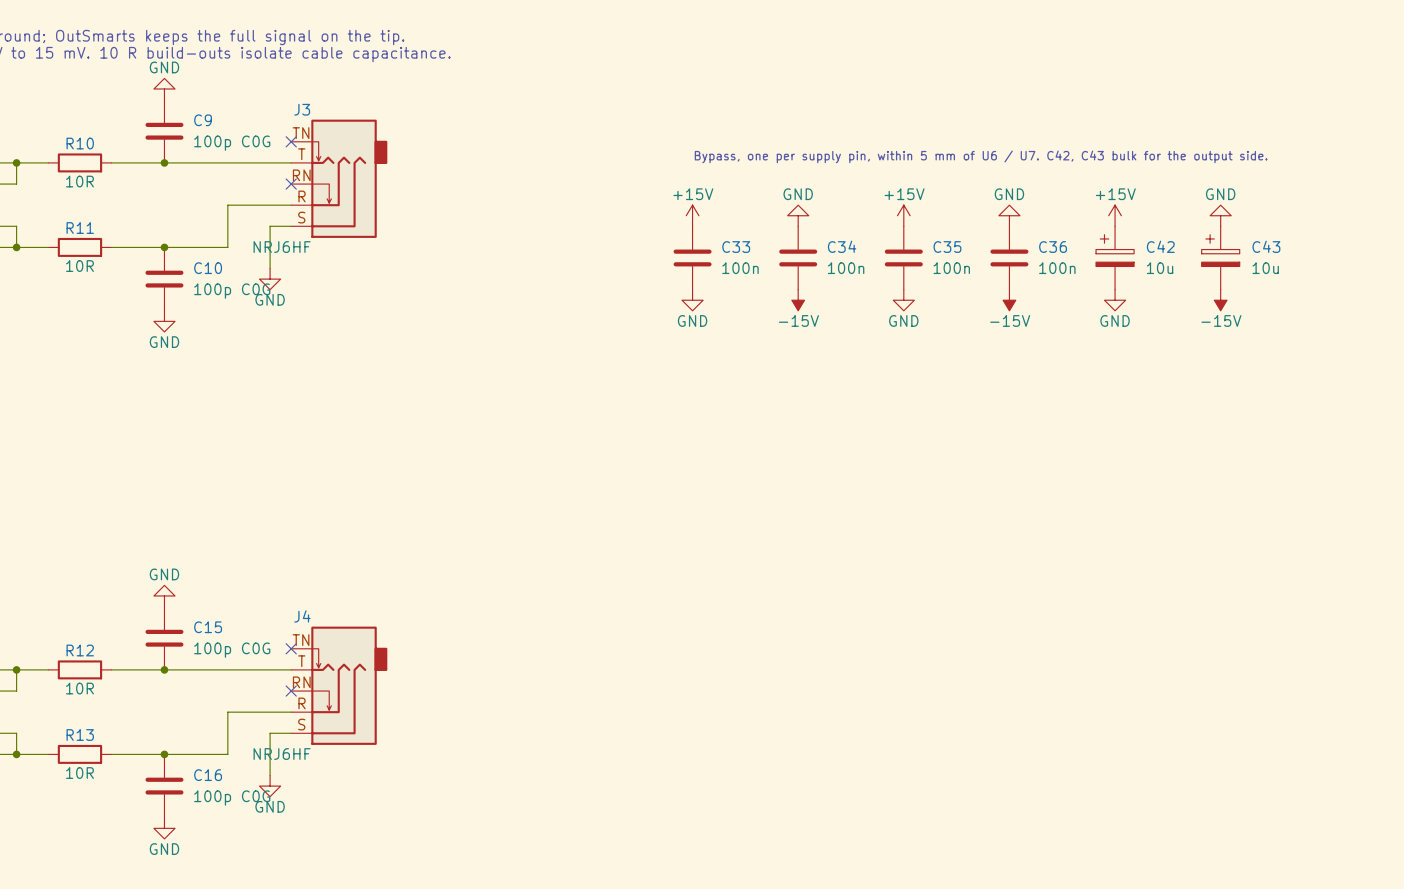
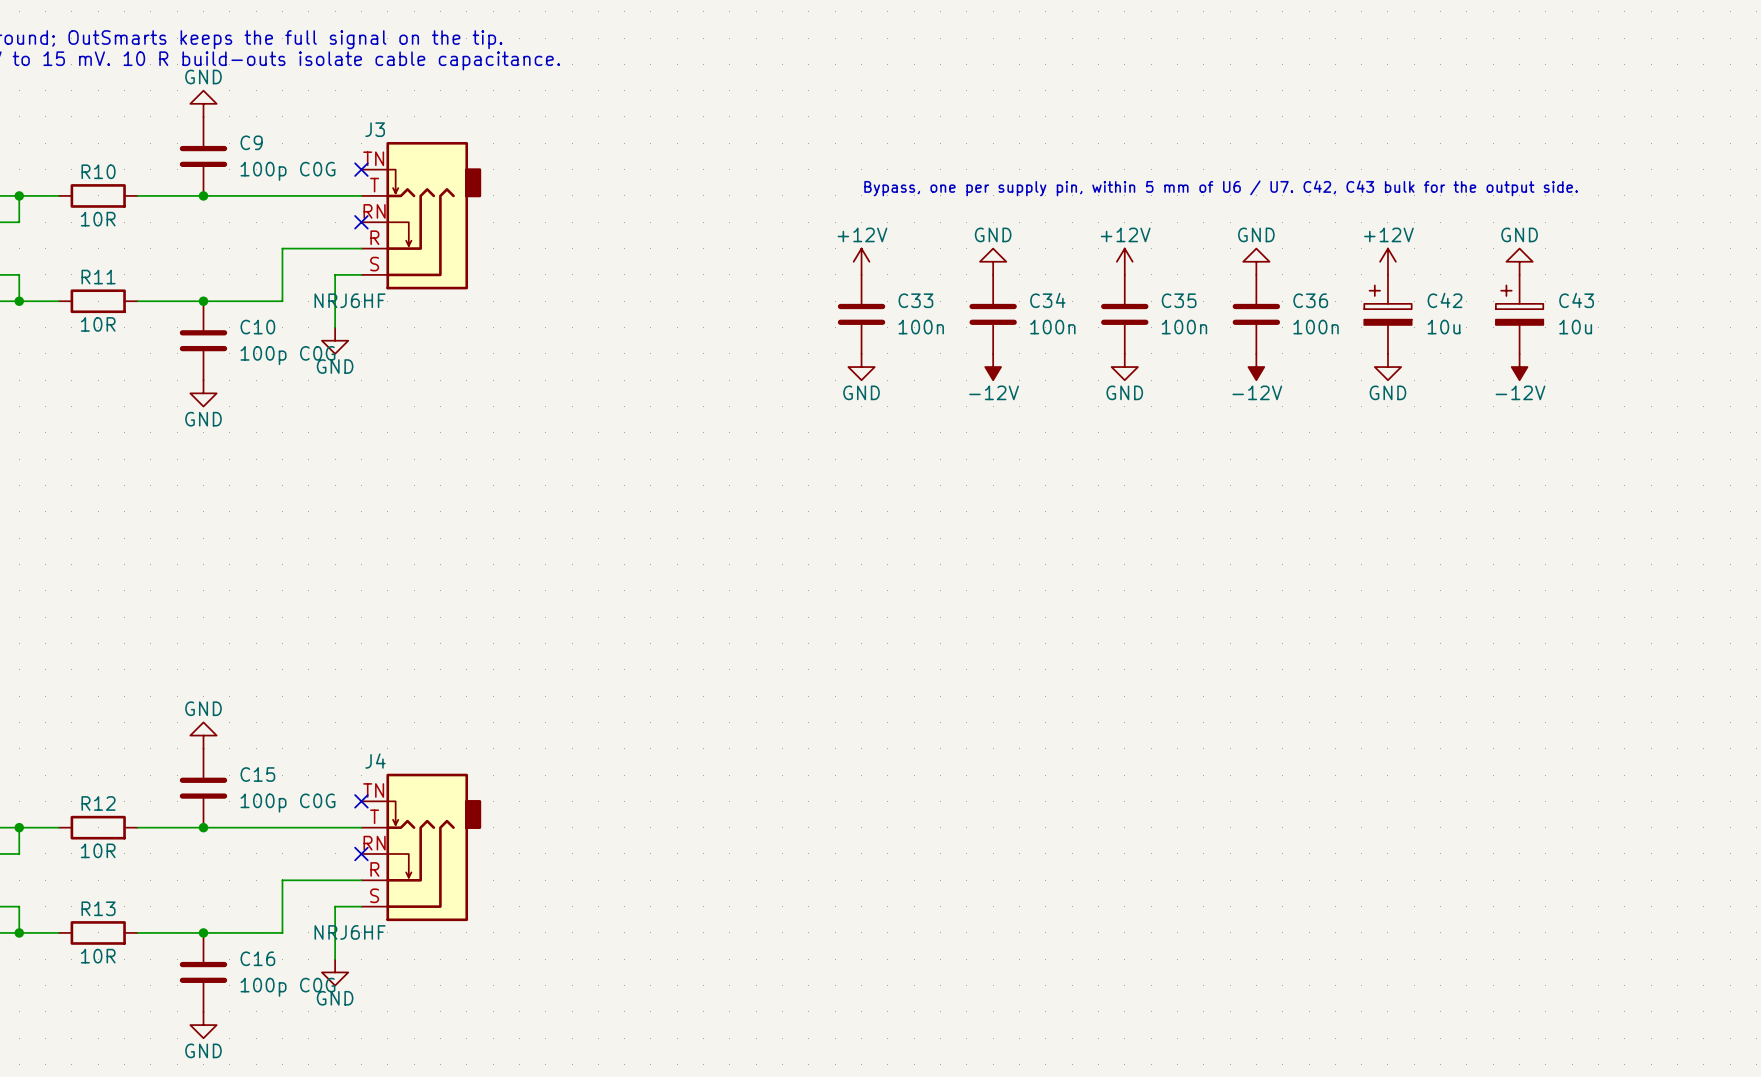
power symbol: +15V (692, 215) -> +12V (861, 261)
power symbol: +15V (903, 215) -> +12V (1124, 261)
power symbol: +15V (1115, 215) -> +12V (1387, 261)
power symbol: -15V (798, 300) -> -12V (993, 367)
power symbol: -15V (1009, 300) -> -12V (1256, 367)
power symbol: -15V (1220, 300) -> -12V (1519, 367)

